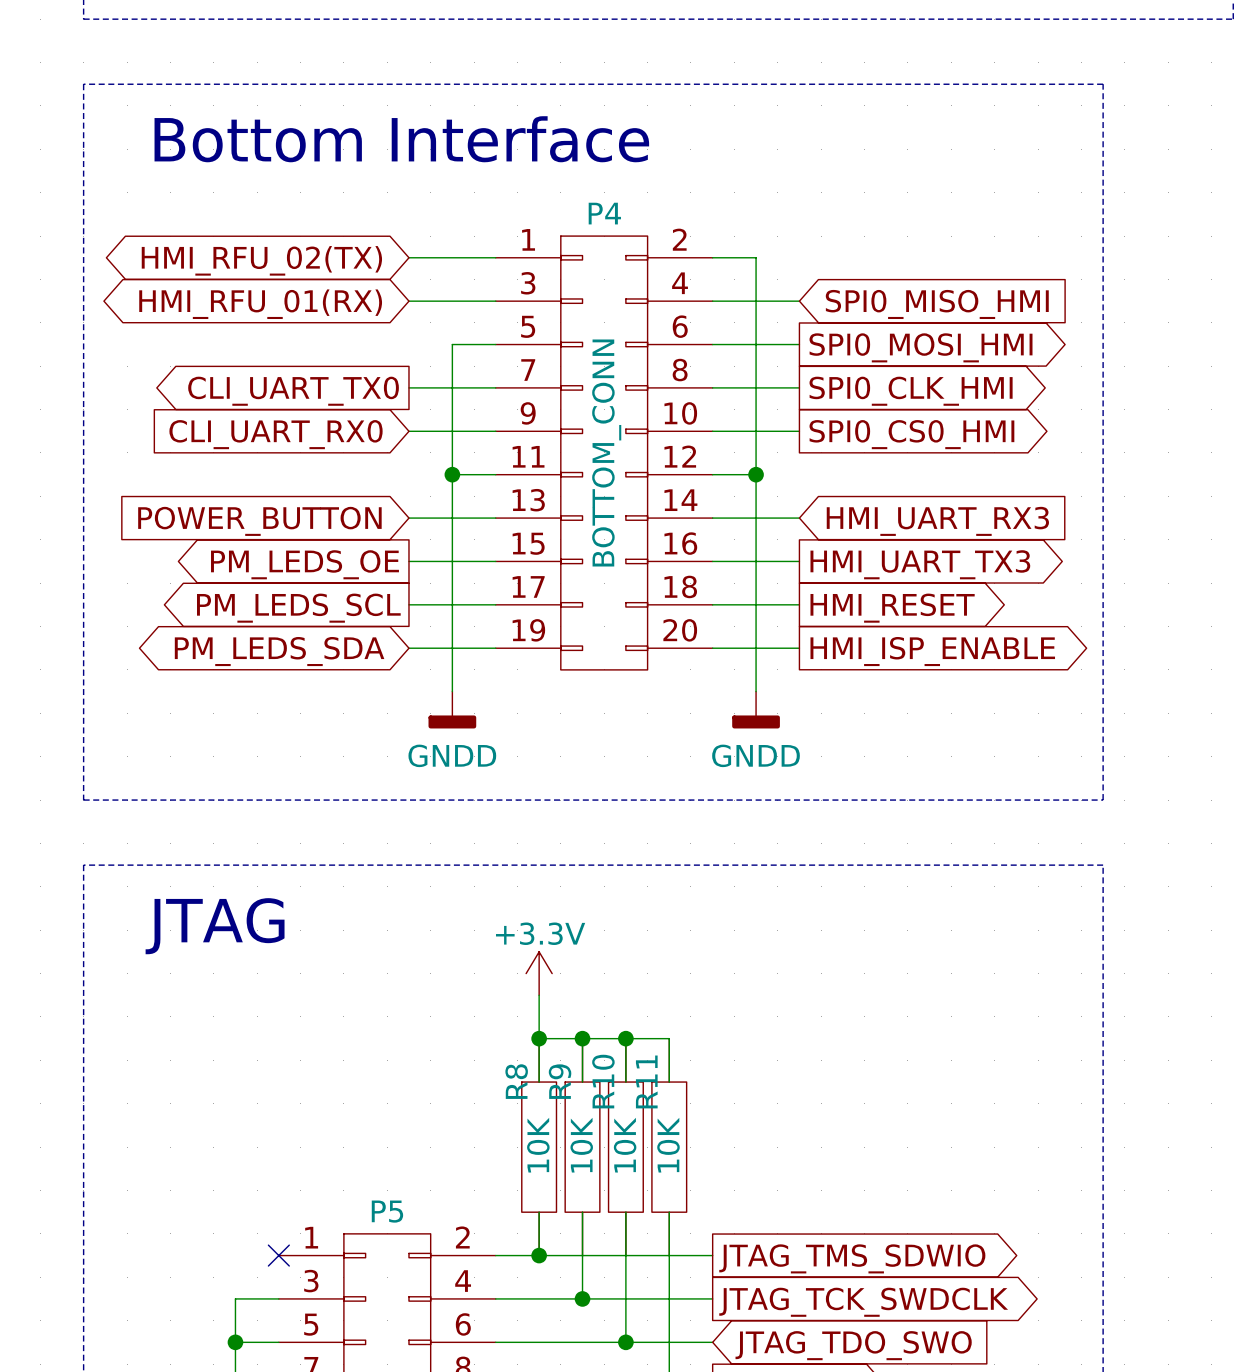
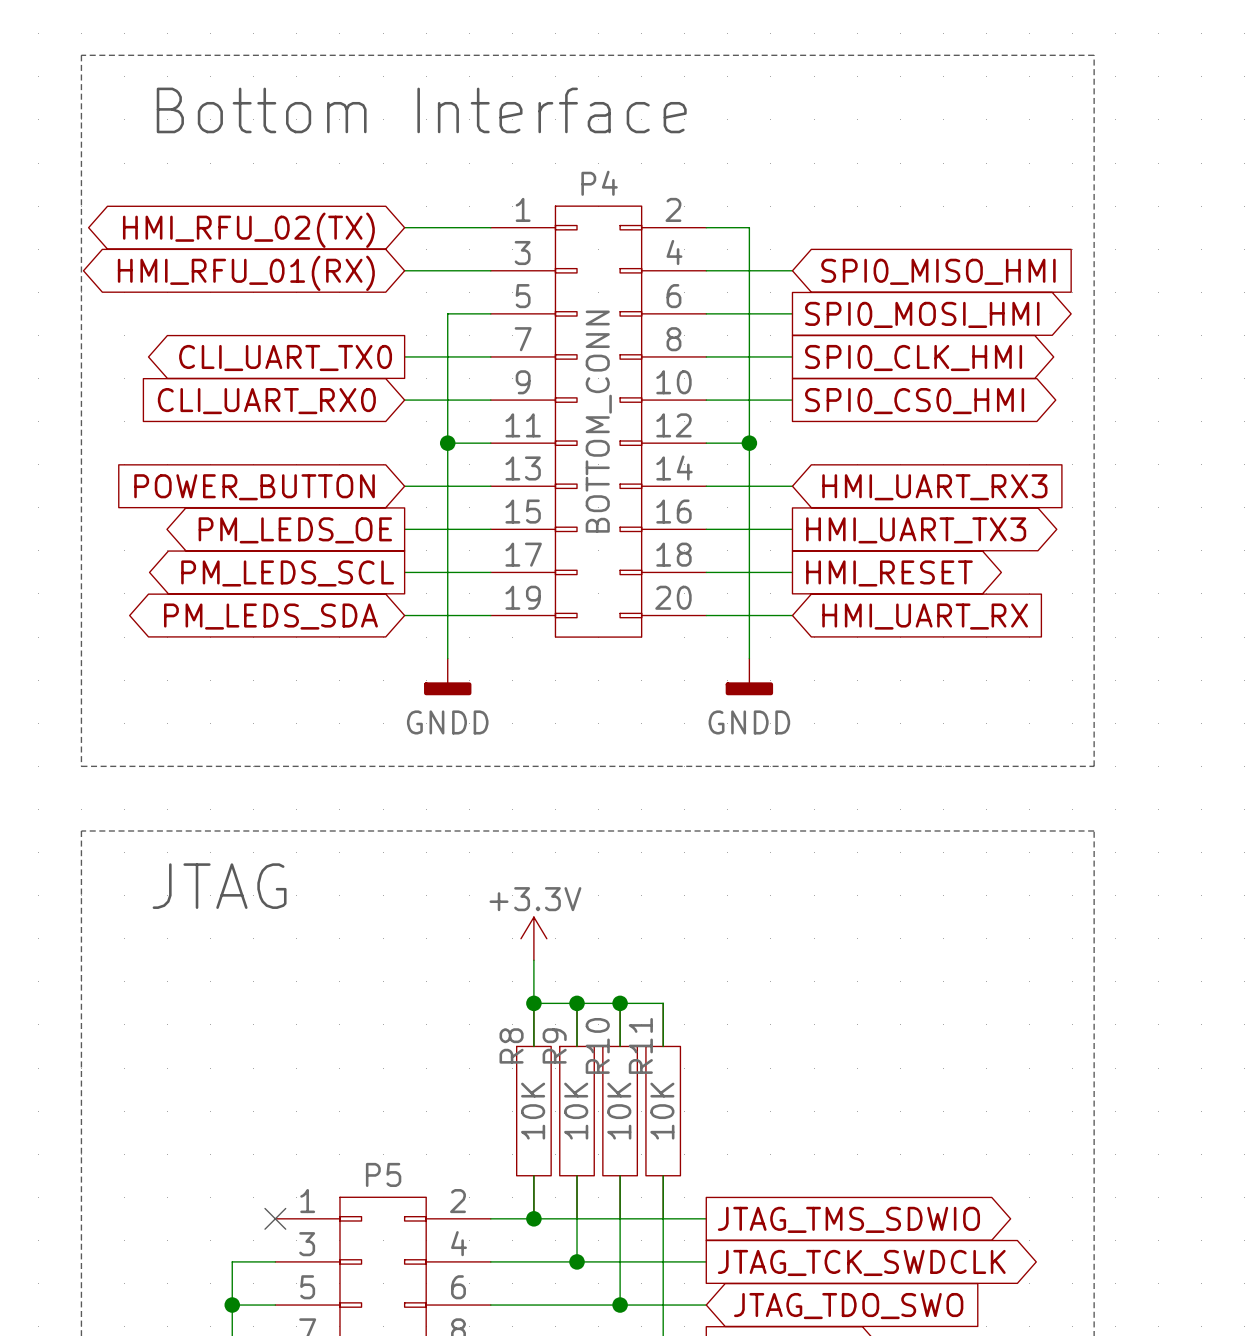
global label shape: output (932, 651) -> input (925, 616)
global label: HMI_ISP_ENABLE (932, 651) -> HMI_UART_RX (925, 616)

